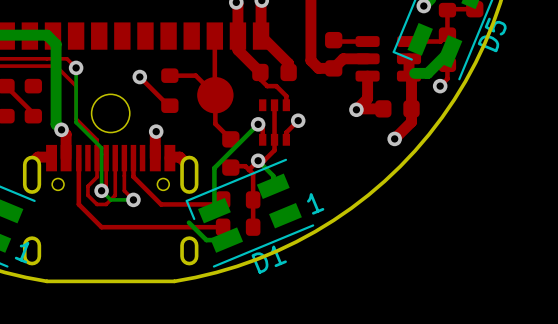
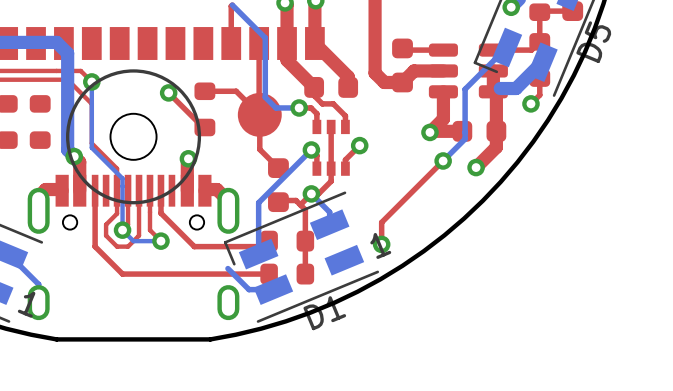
top track: none -> (232, 5) (231, 43)
bottom track: none -> (232, 5) (265, 38) (265, 97) (275, 107) (299, 107)
bottom track: none -> (506, 47) (465, 89) (465, 139) (443, 160)
drawing: none -> [66, 69, 202, 205]
top track: (6, 86) (33, 113) (33, 116) -> none
top track: none -> (299, 107) (311, 107) (316, 113) (316, 126)
via: none -> (299, 107)
top track: none -> (443, 160) (381, 222) (381, 244)
via: none -> (443, 160)
via: none -> (381, 244)
bottom track: none -> (8, 254) (38, 284) (38, 302)

